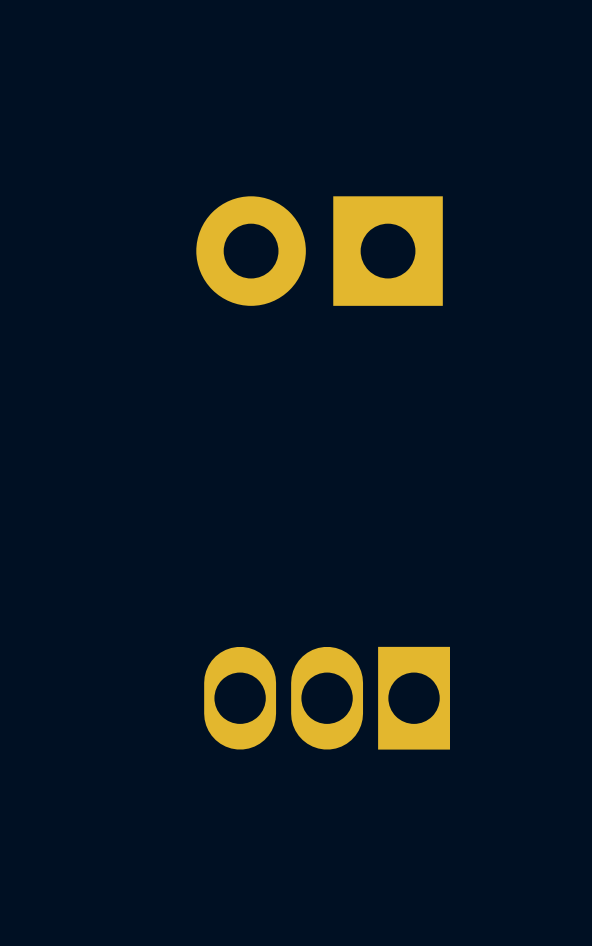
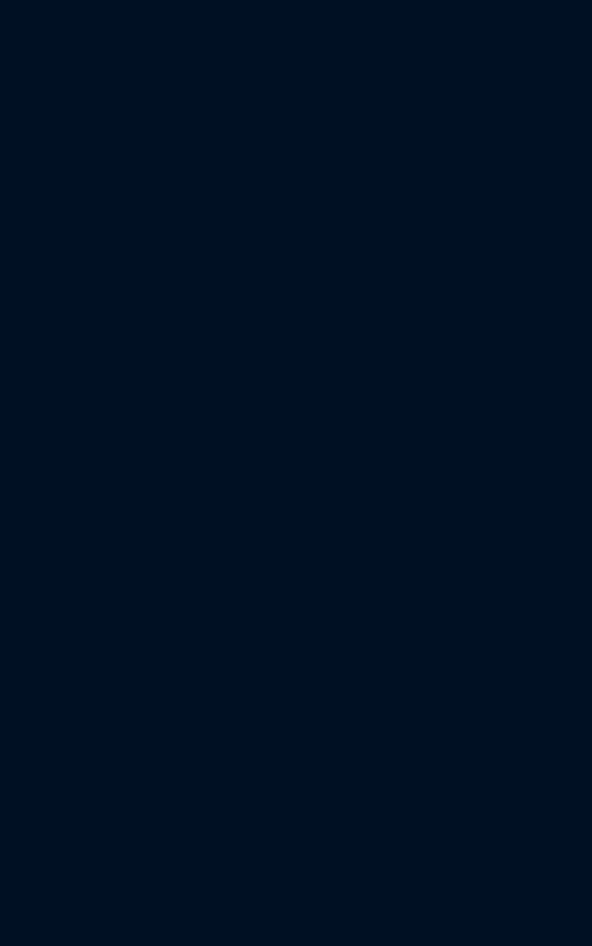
part: (319, 251) -> none
part: (327, 698) -> none

